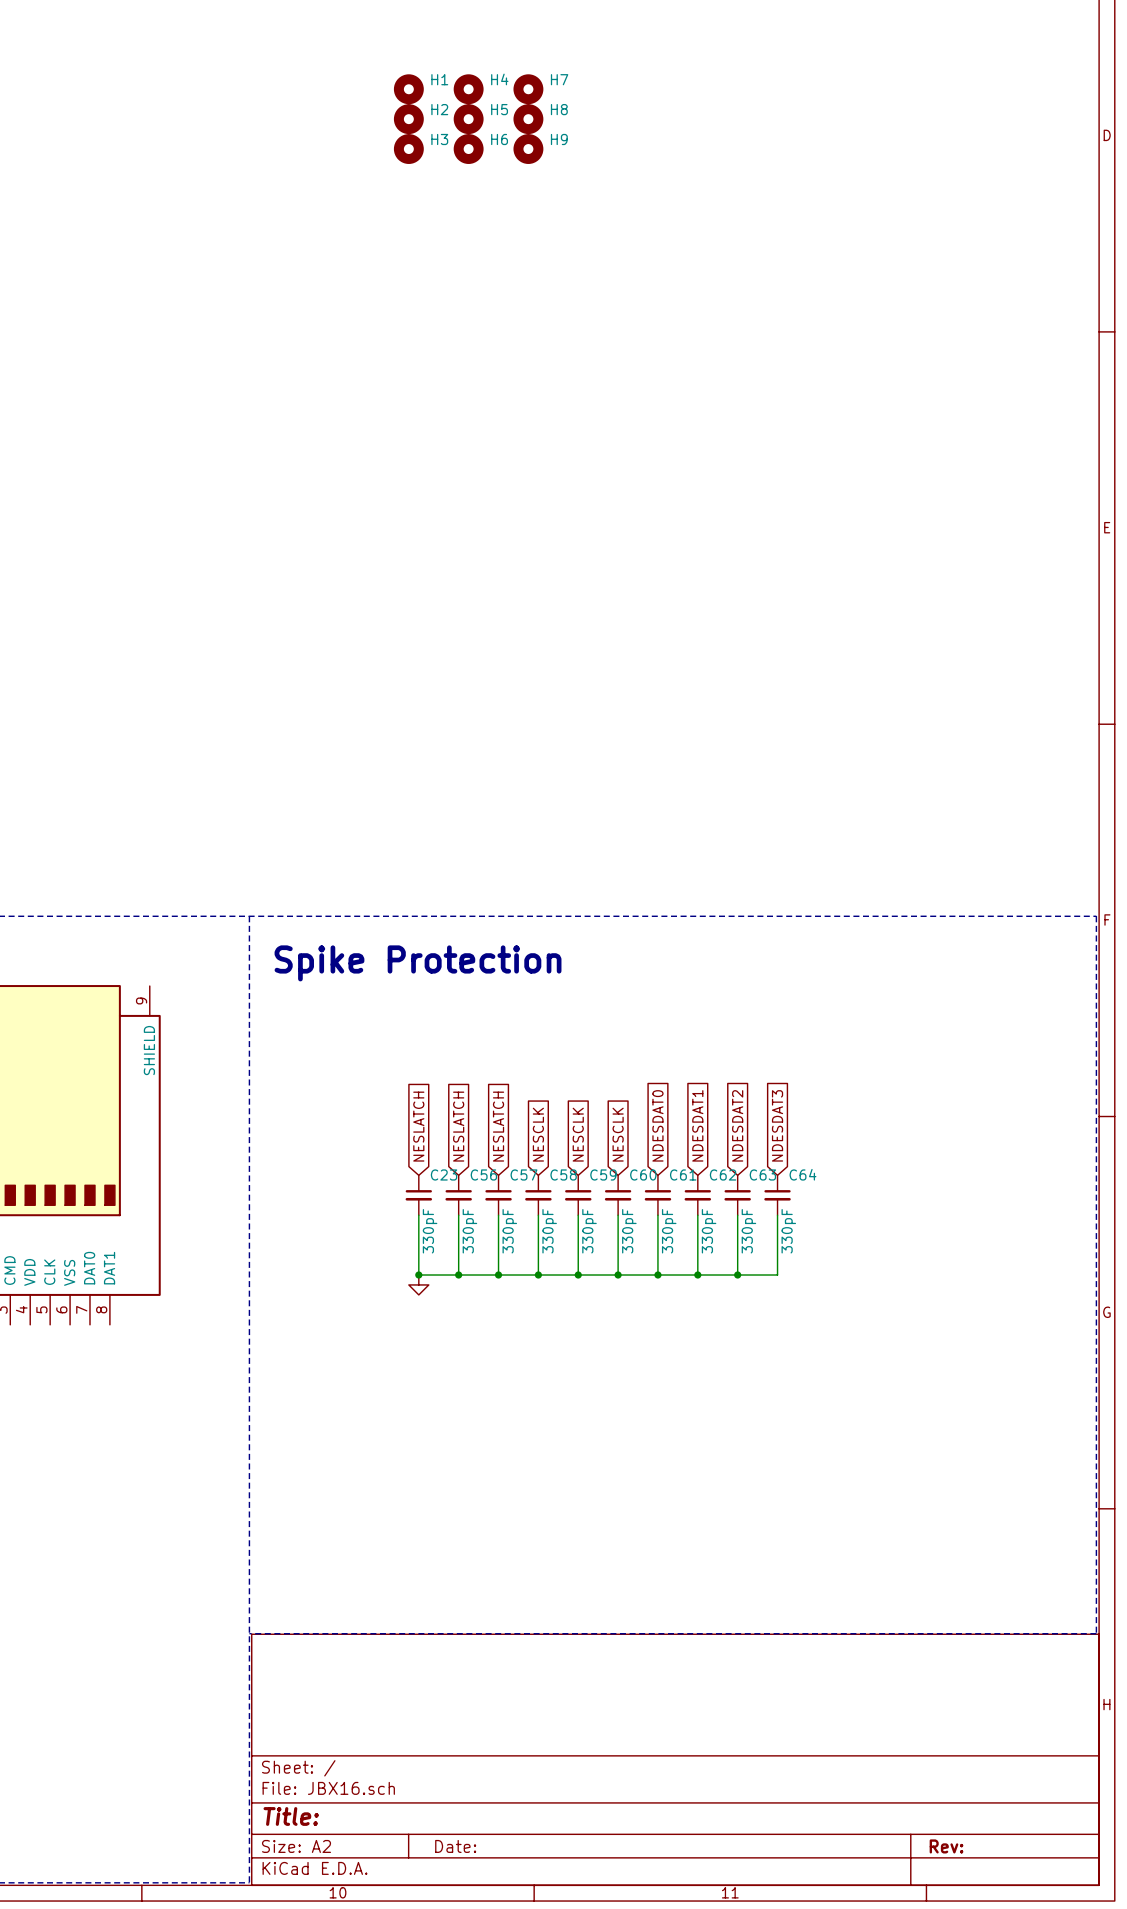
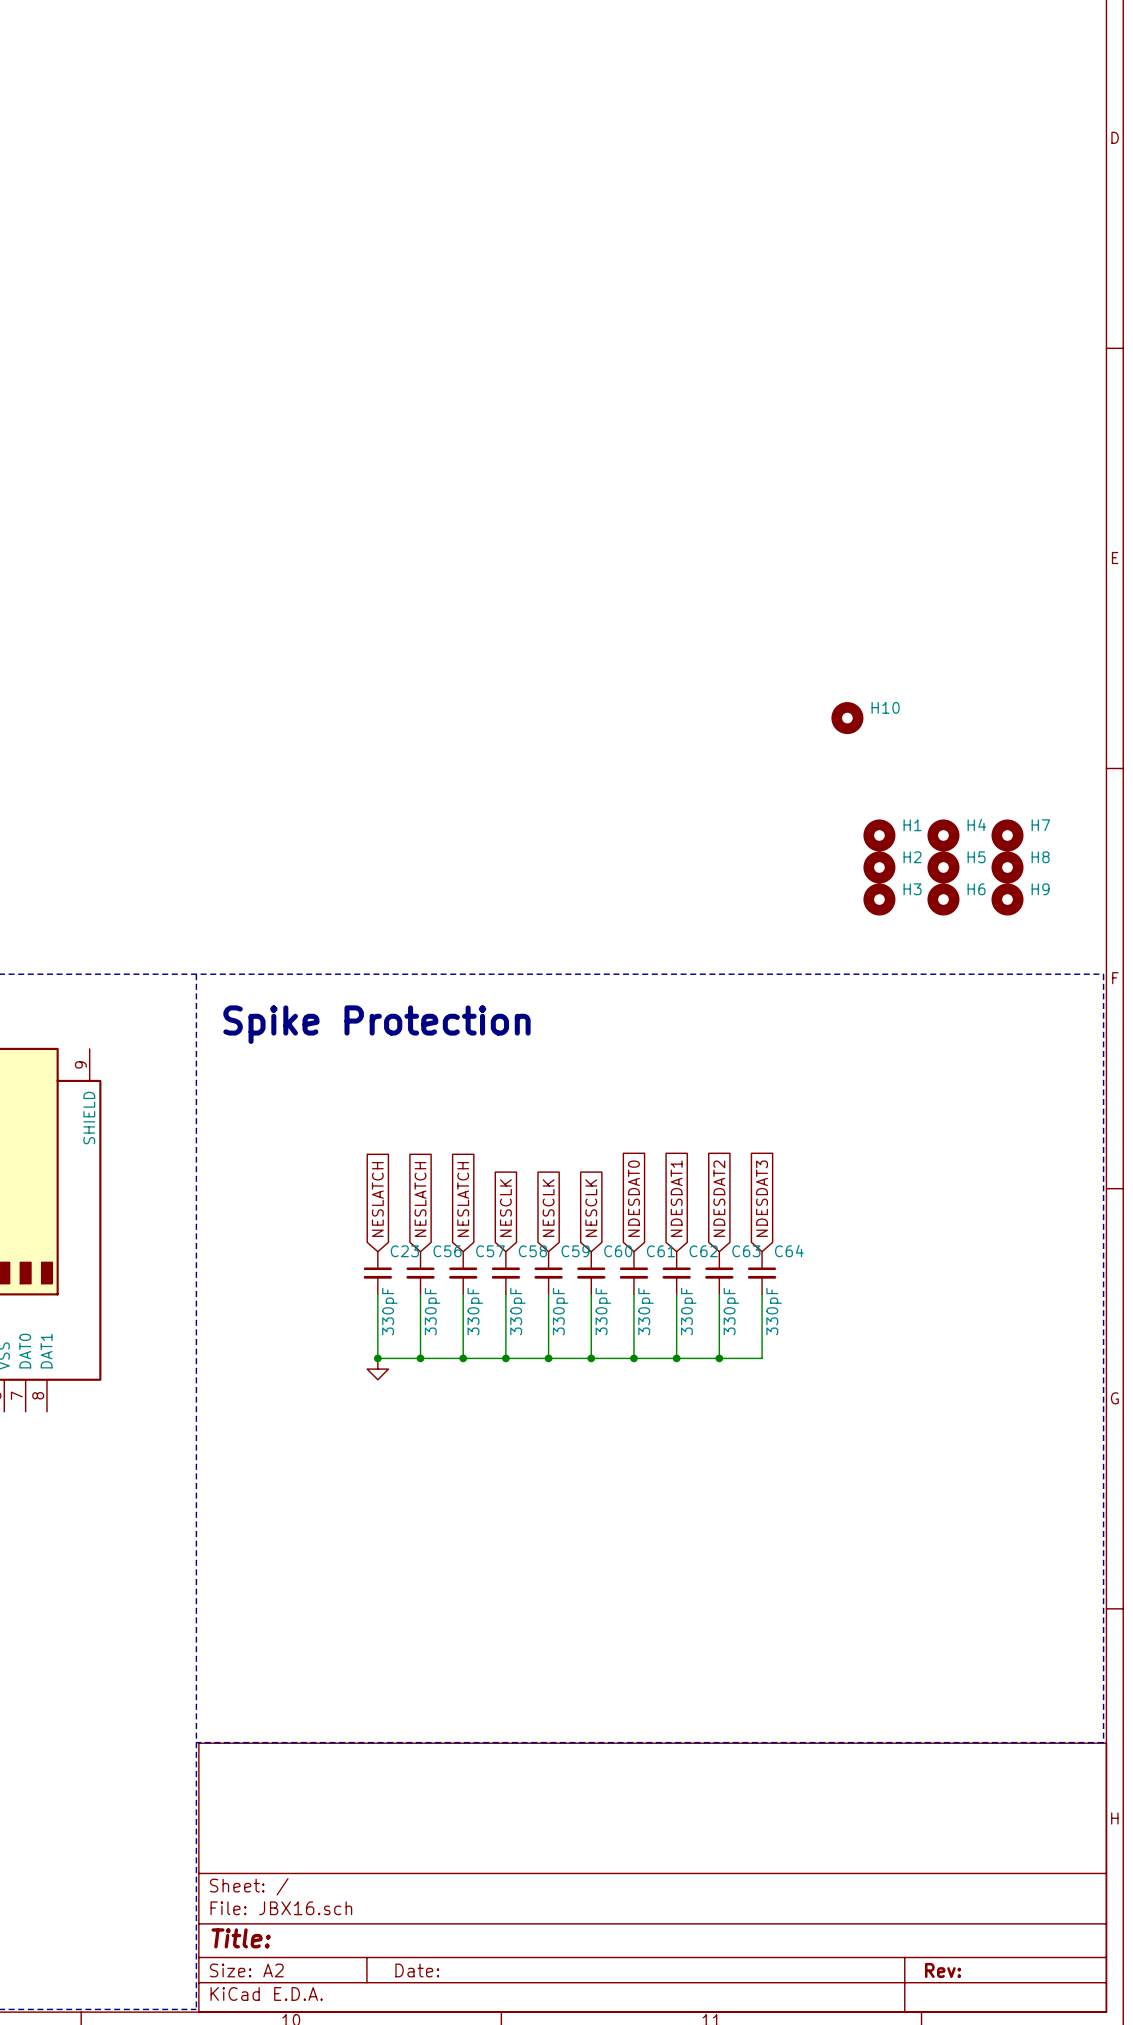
H1 position: (408, 89) -> (879, 835)
H4 position: (468, 89) -> (943, 835)
H7 position: (528, 89) -> (1007, 835)
H2 position: (408, 119) -> (879, 867)
H5 position: (468, 119) -> (943, 867)
H8 position: (528, 119) -> (1007, 867)
H3 position: (408, 149) -> (879, 899)
H6 position: (468, 149) -> (943, 899)
H9 position: (528, 149) -> (1007, 899)
H10: none -> (847, 718)

